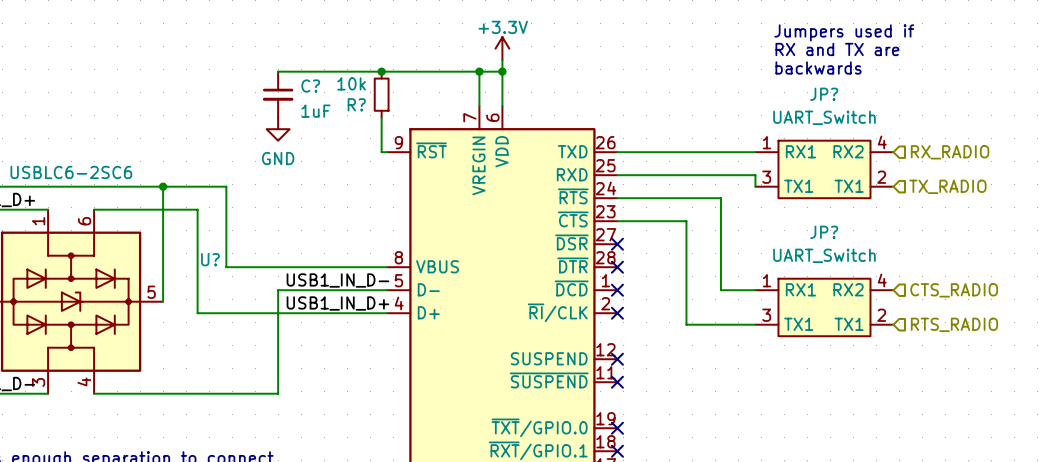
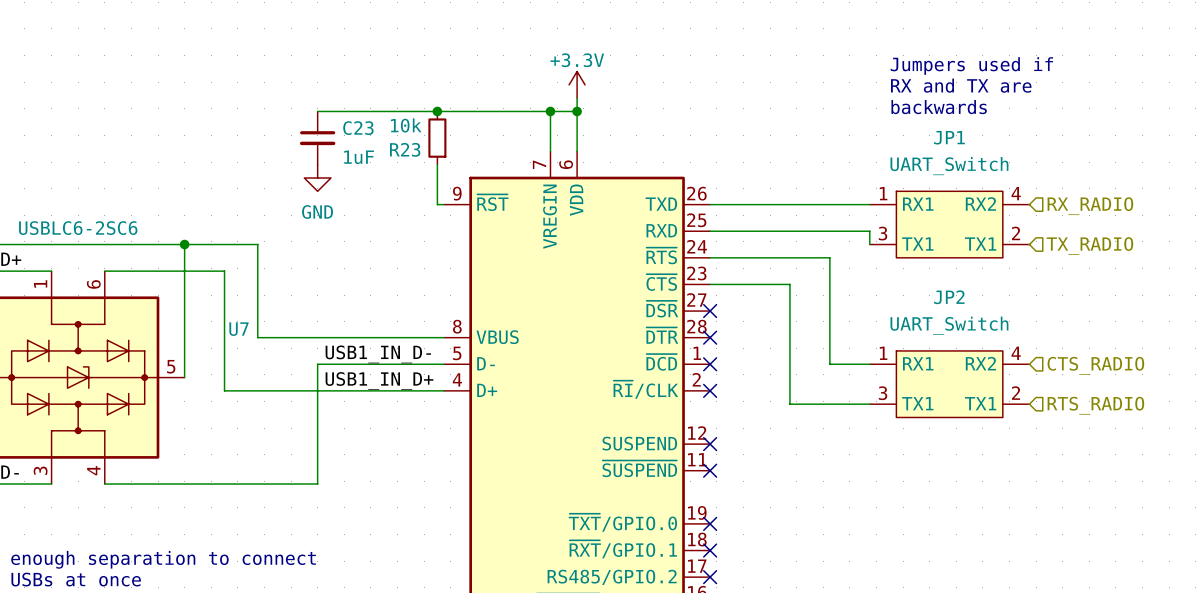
C? name: C? (310, 86) -> C23 (358, 128)
JP? name: JP? (824, 94) -> JP1 (949, 137)
R? name: R? (356, 104) -> R23 (405, 149)
JP? name: JP? (824, 232) -> JP2 (949, 297)
U? name: U? (210, 259) -> U7 (239, 329)

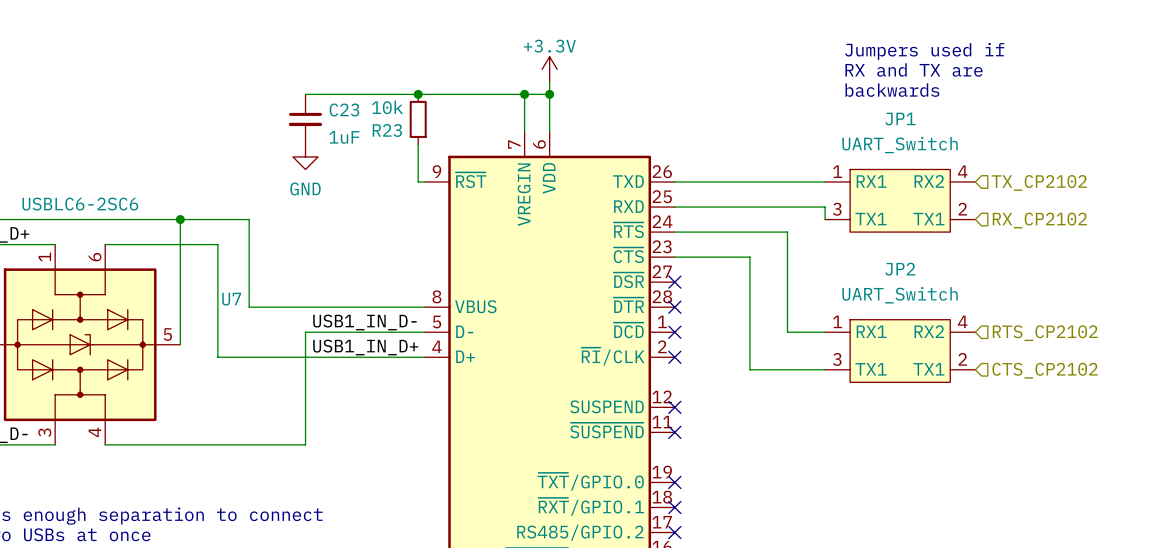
hierarchical label: RX_RADIO (1090, 206) -> TX_CP2102 (1039, 182)
hierarchical label: TX_RADIO (1089, 246) -> RX_CP2102 (1039, 220)
hierarchical label: CTS_RADIO (1095, 365) -> RTS_CP2102 (1045, 333)
hierarchical label: RTS_RADIO (1095, 405) -> CTS_CP2102 (1045, 370)

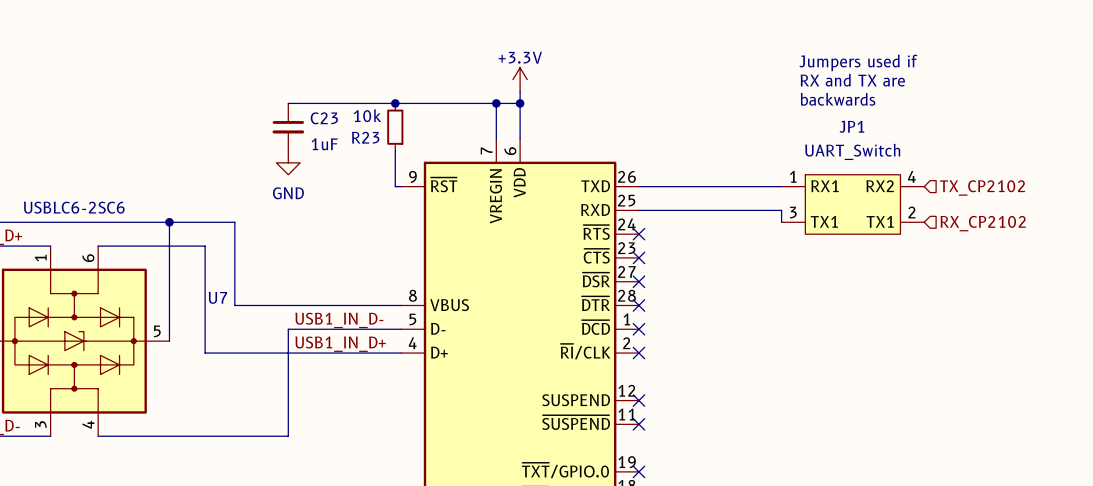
wire: (674, 232) (787, 232) (787, 332) (825, 332) -> none
no-connect mark: none -> (638, 234)
wire: (674, 257) (749, 257) (749, 369) (825, 369) -> none
no-connect mark: none -> (638, 257)
hierarchical label: RTS_CP2102 (1045, 333) -> none
JP2: UART_Switch (900, 351) -> none
hierarchical label: CTS_CP2102 (1045, 370) -> none

